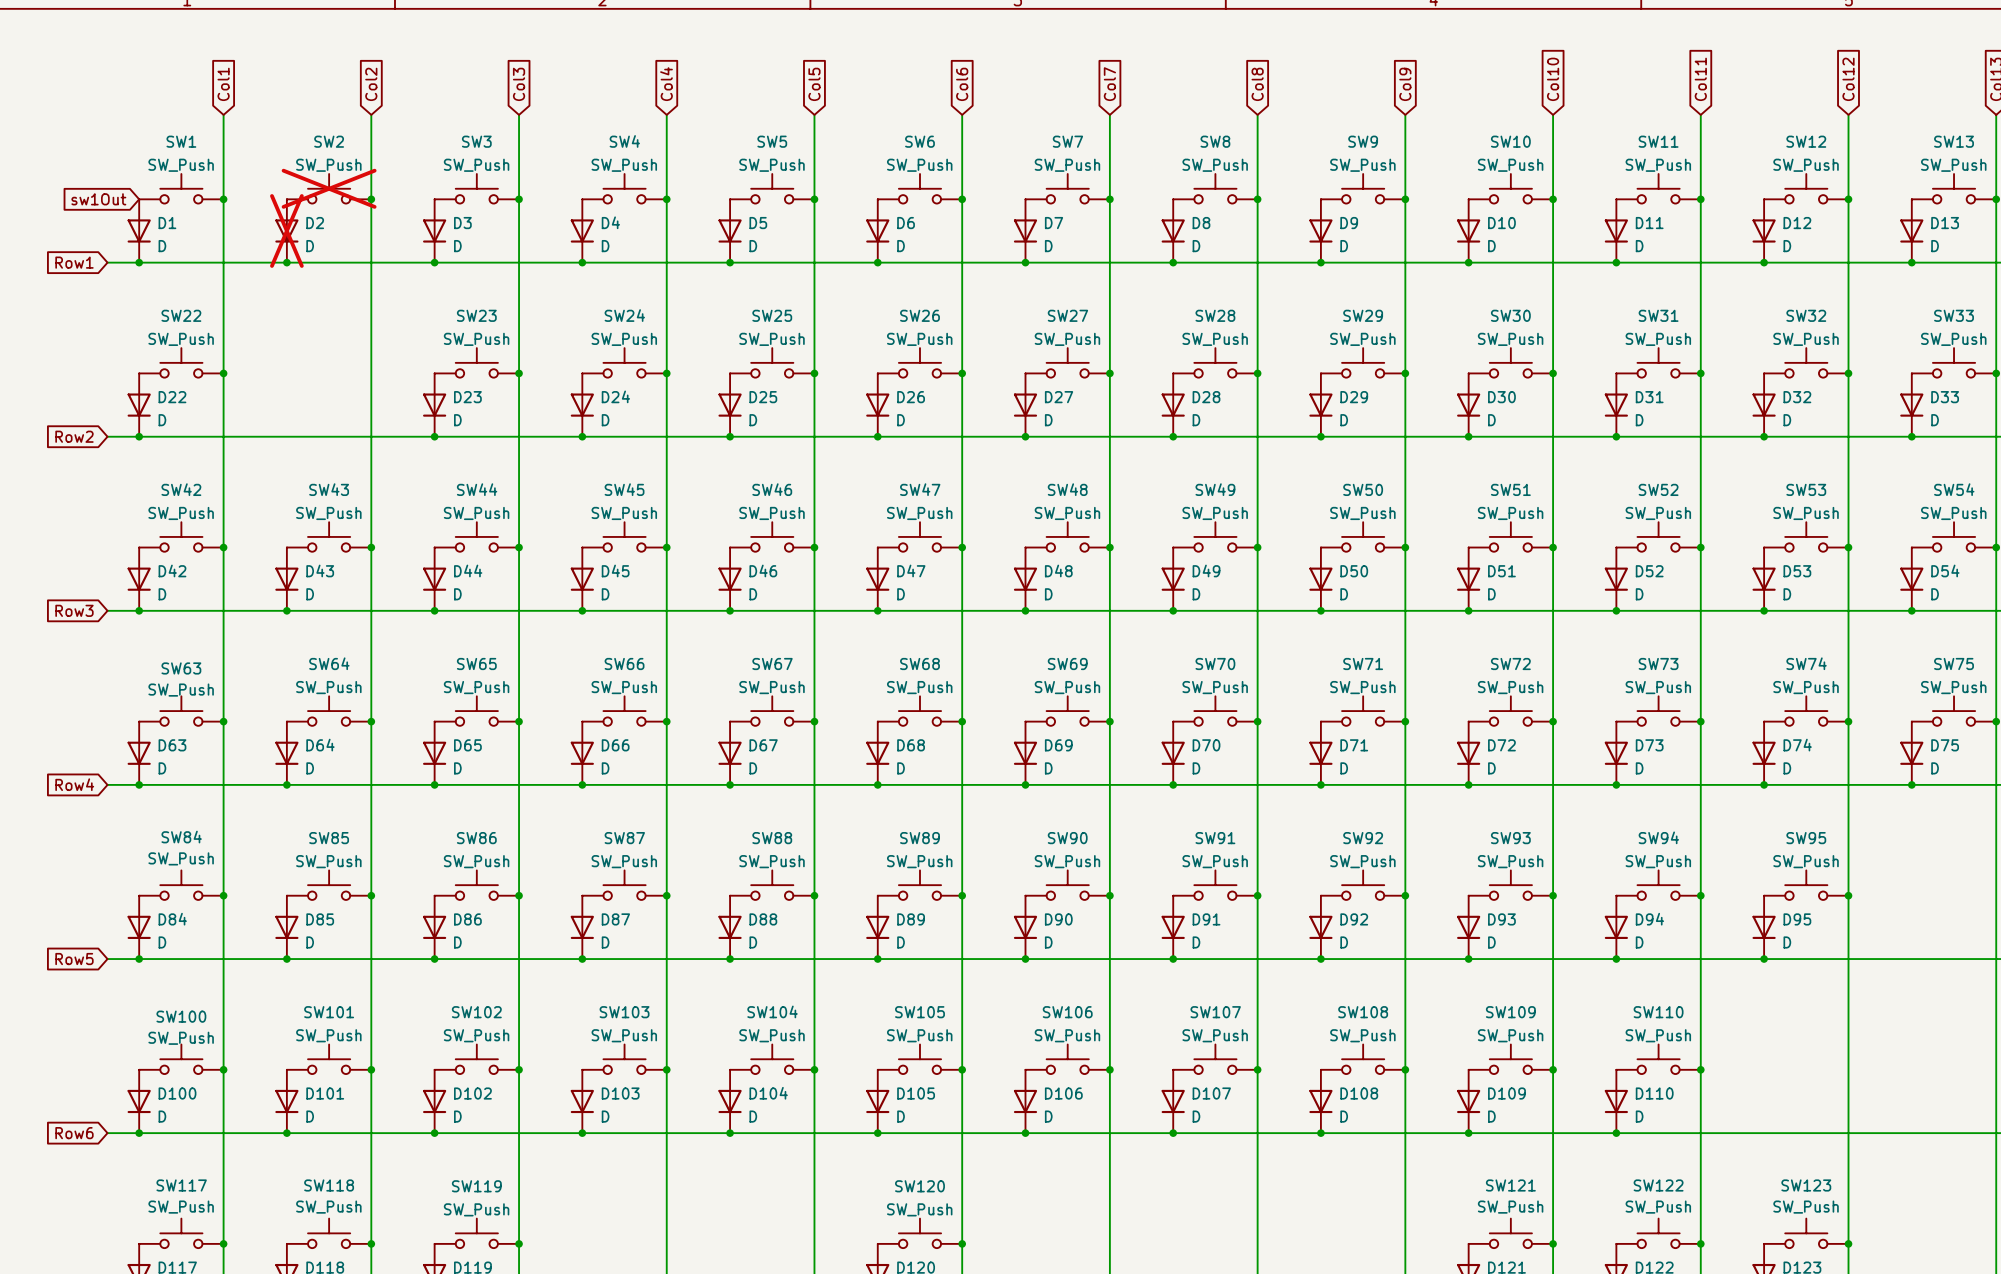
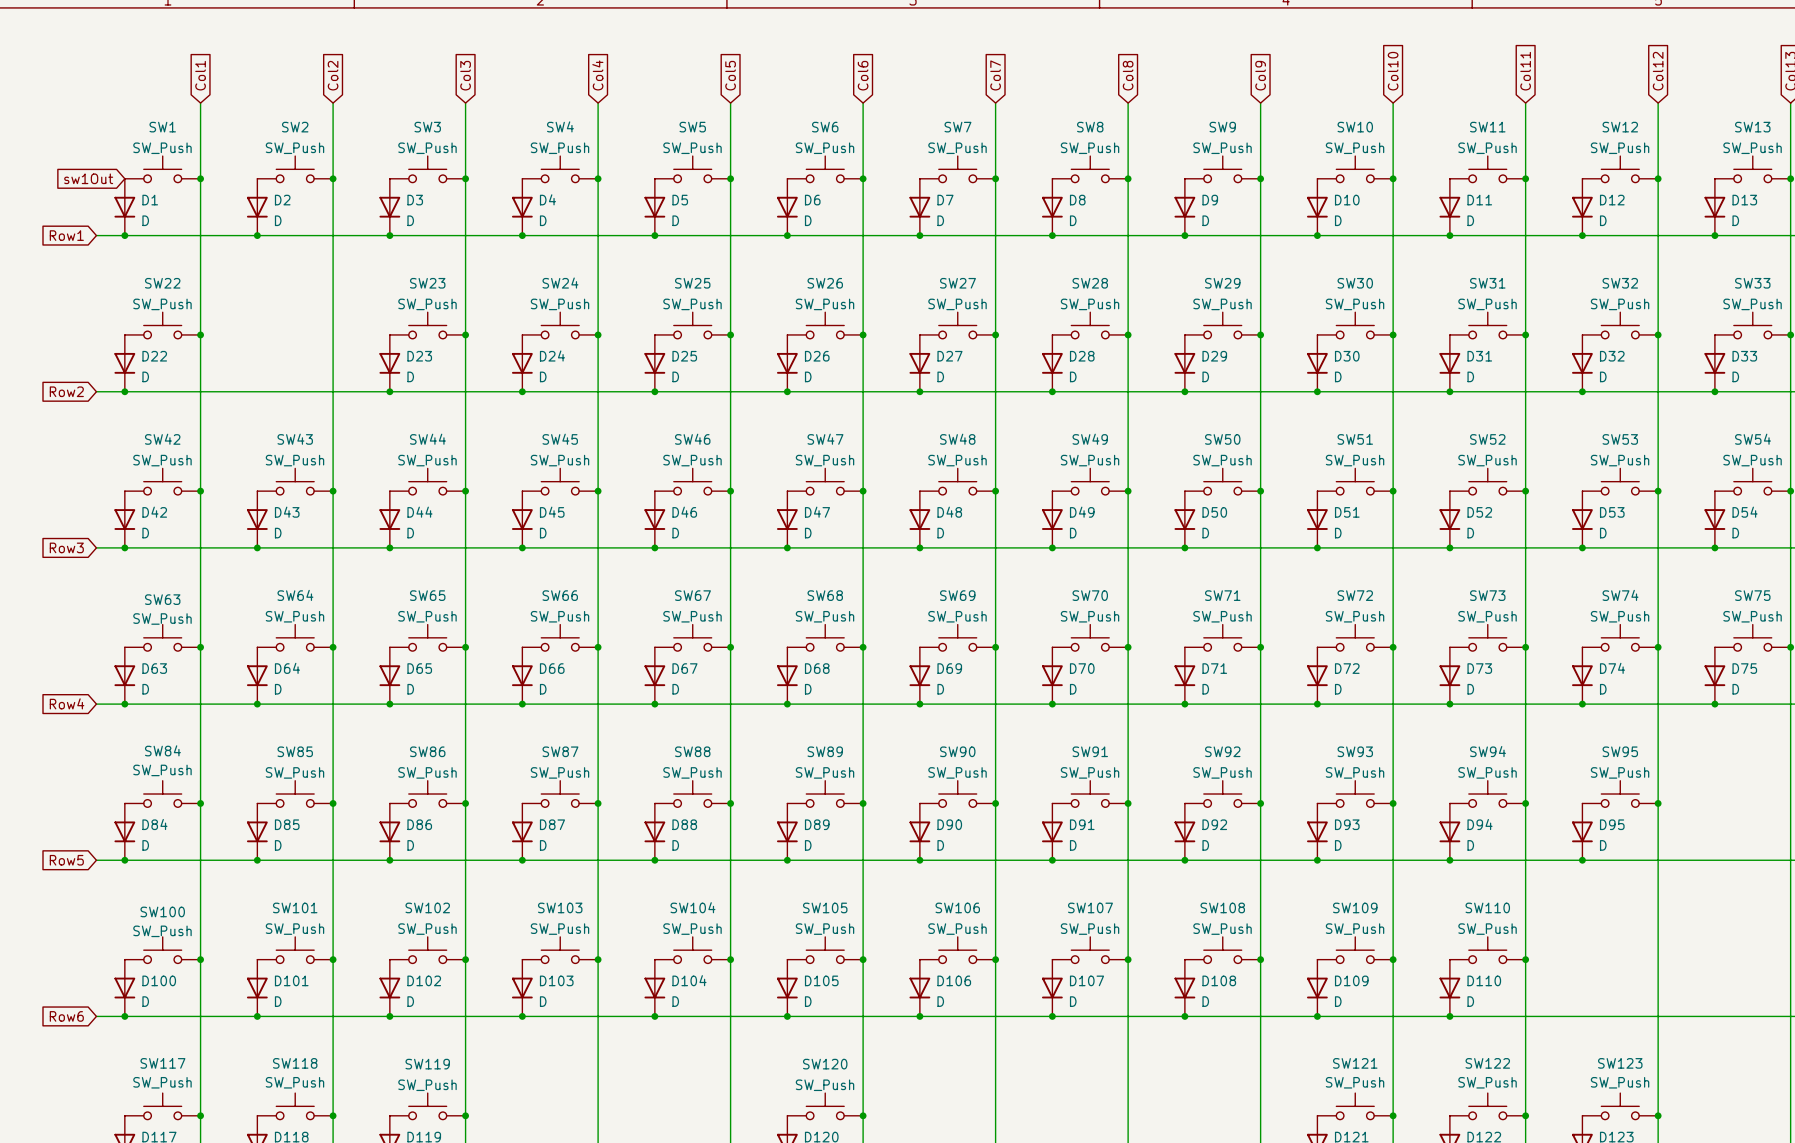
SW2 do-not-place cross: (329, 188) -> none
D2 do-not-place cross: (286, 230) -> none

